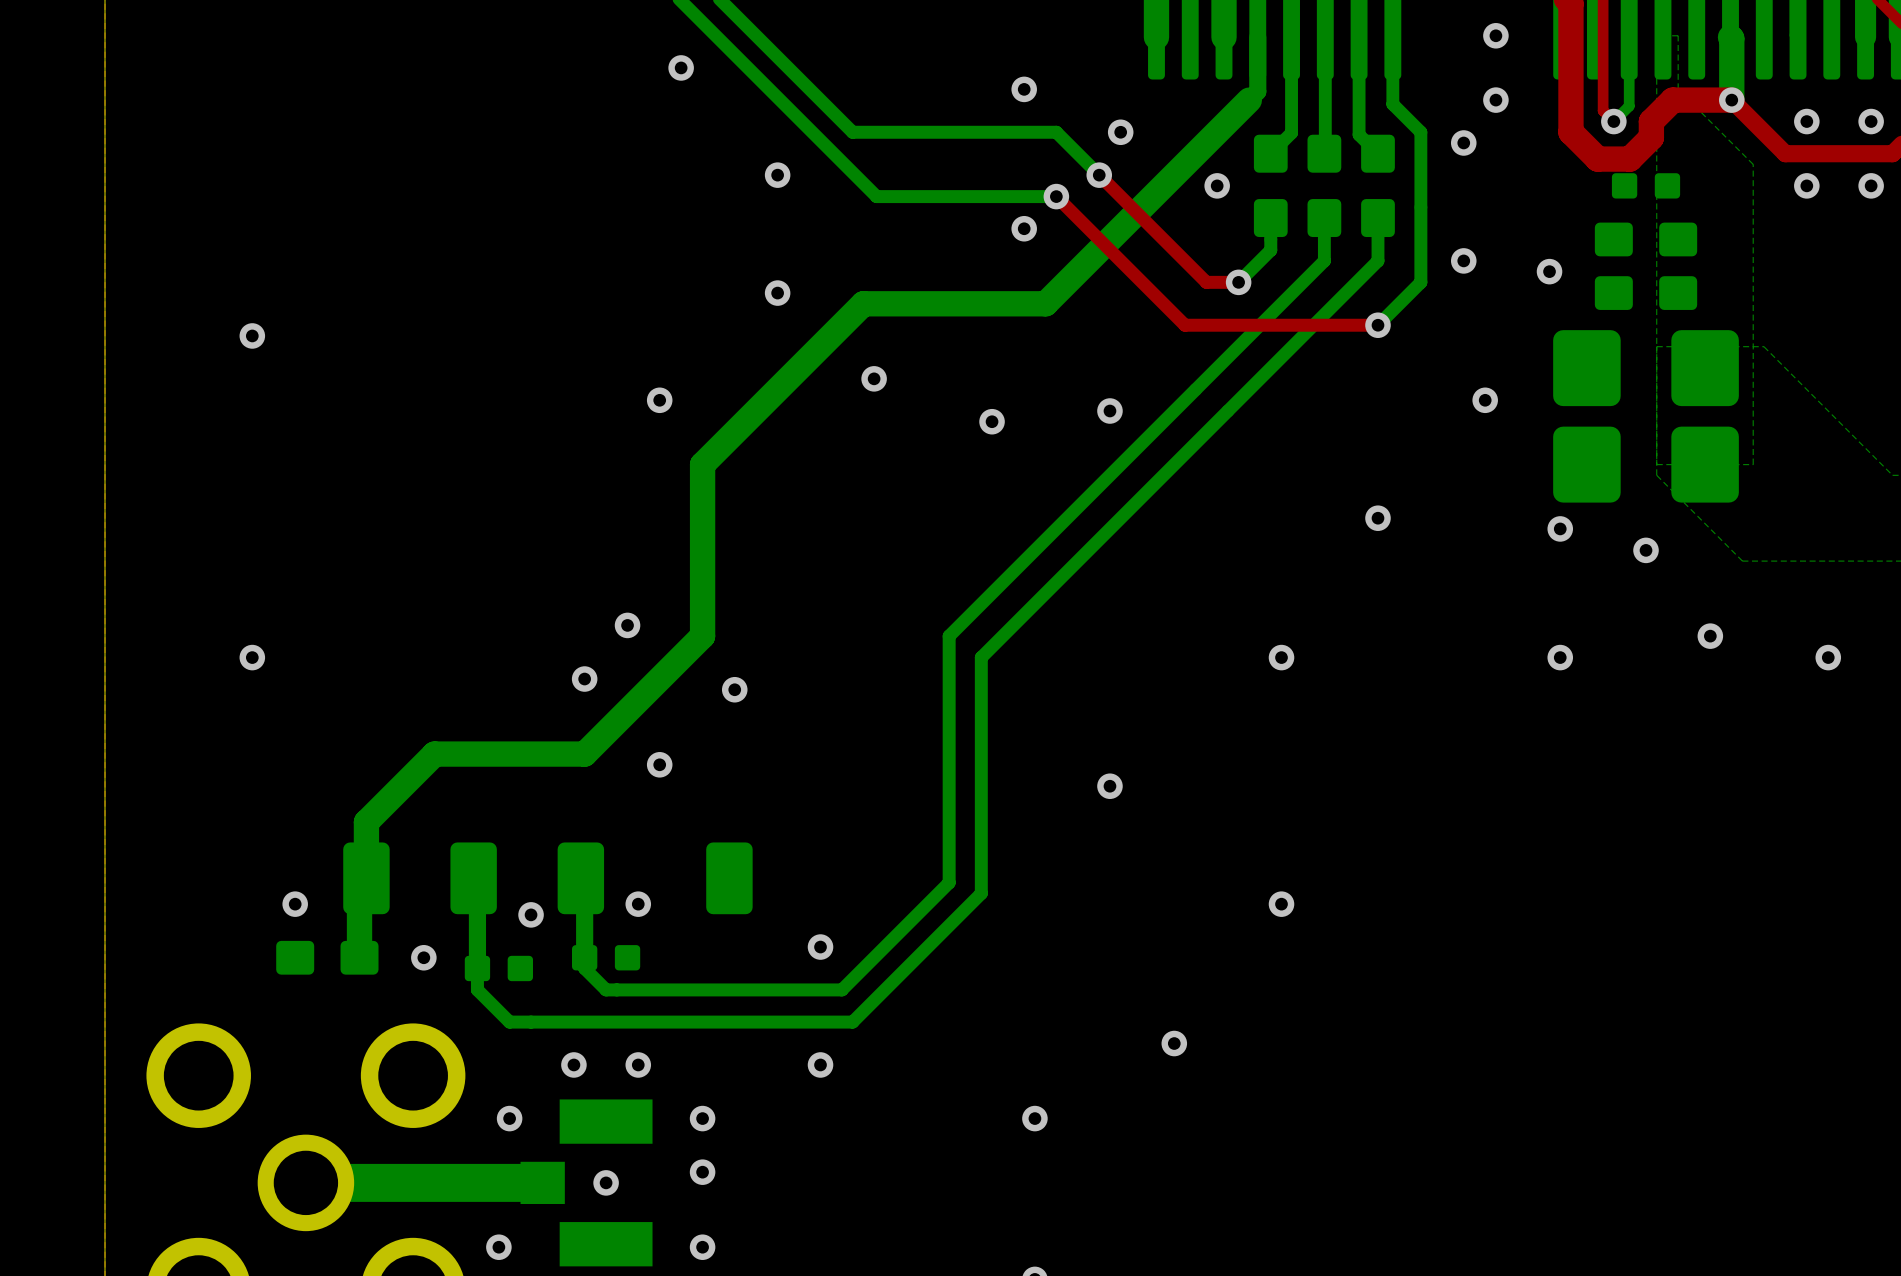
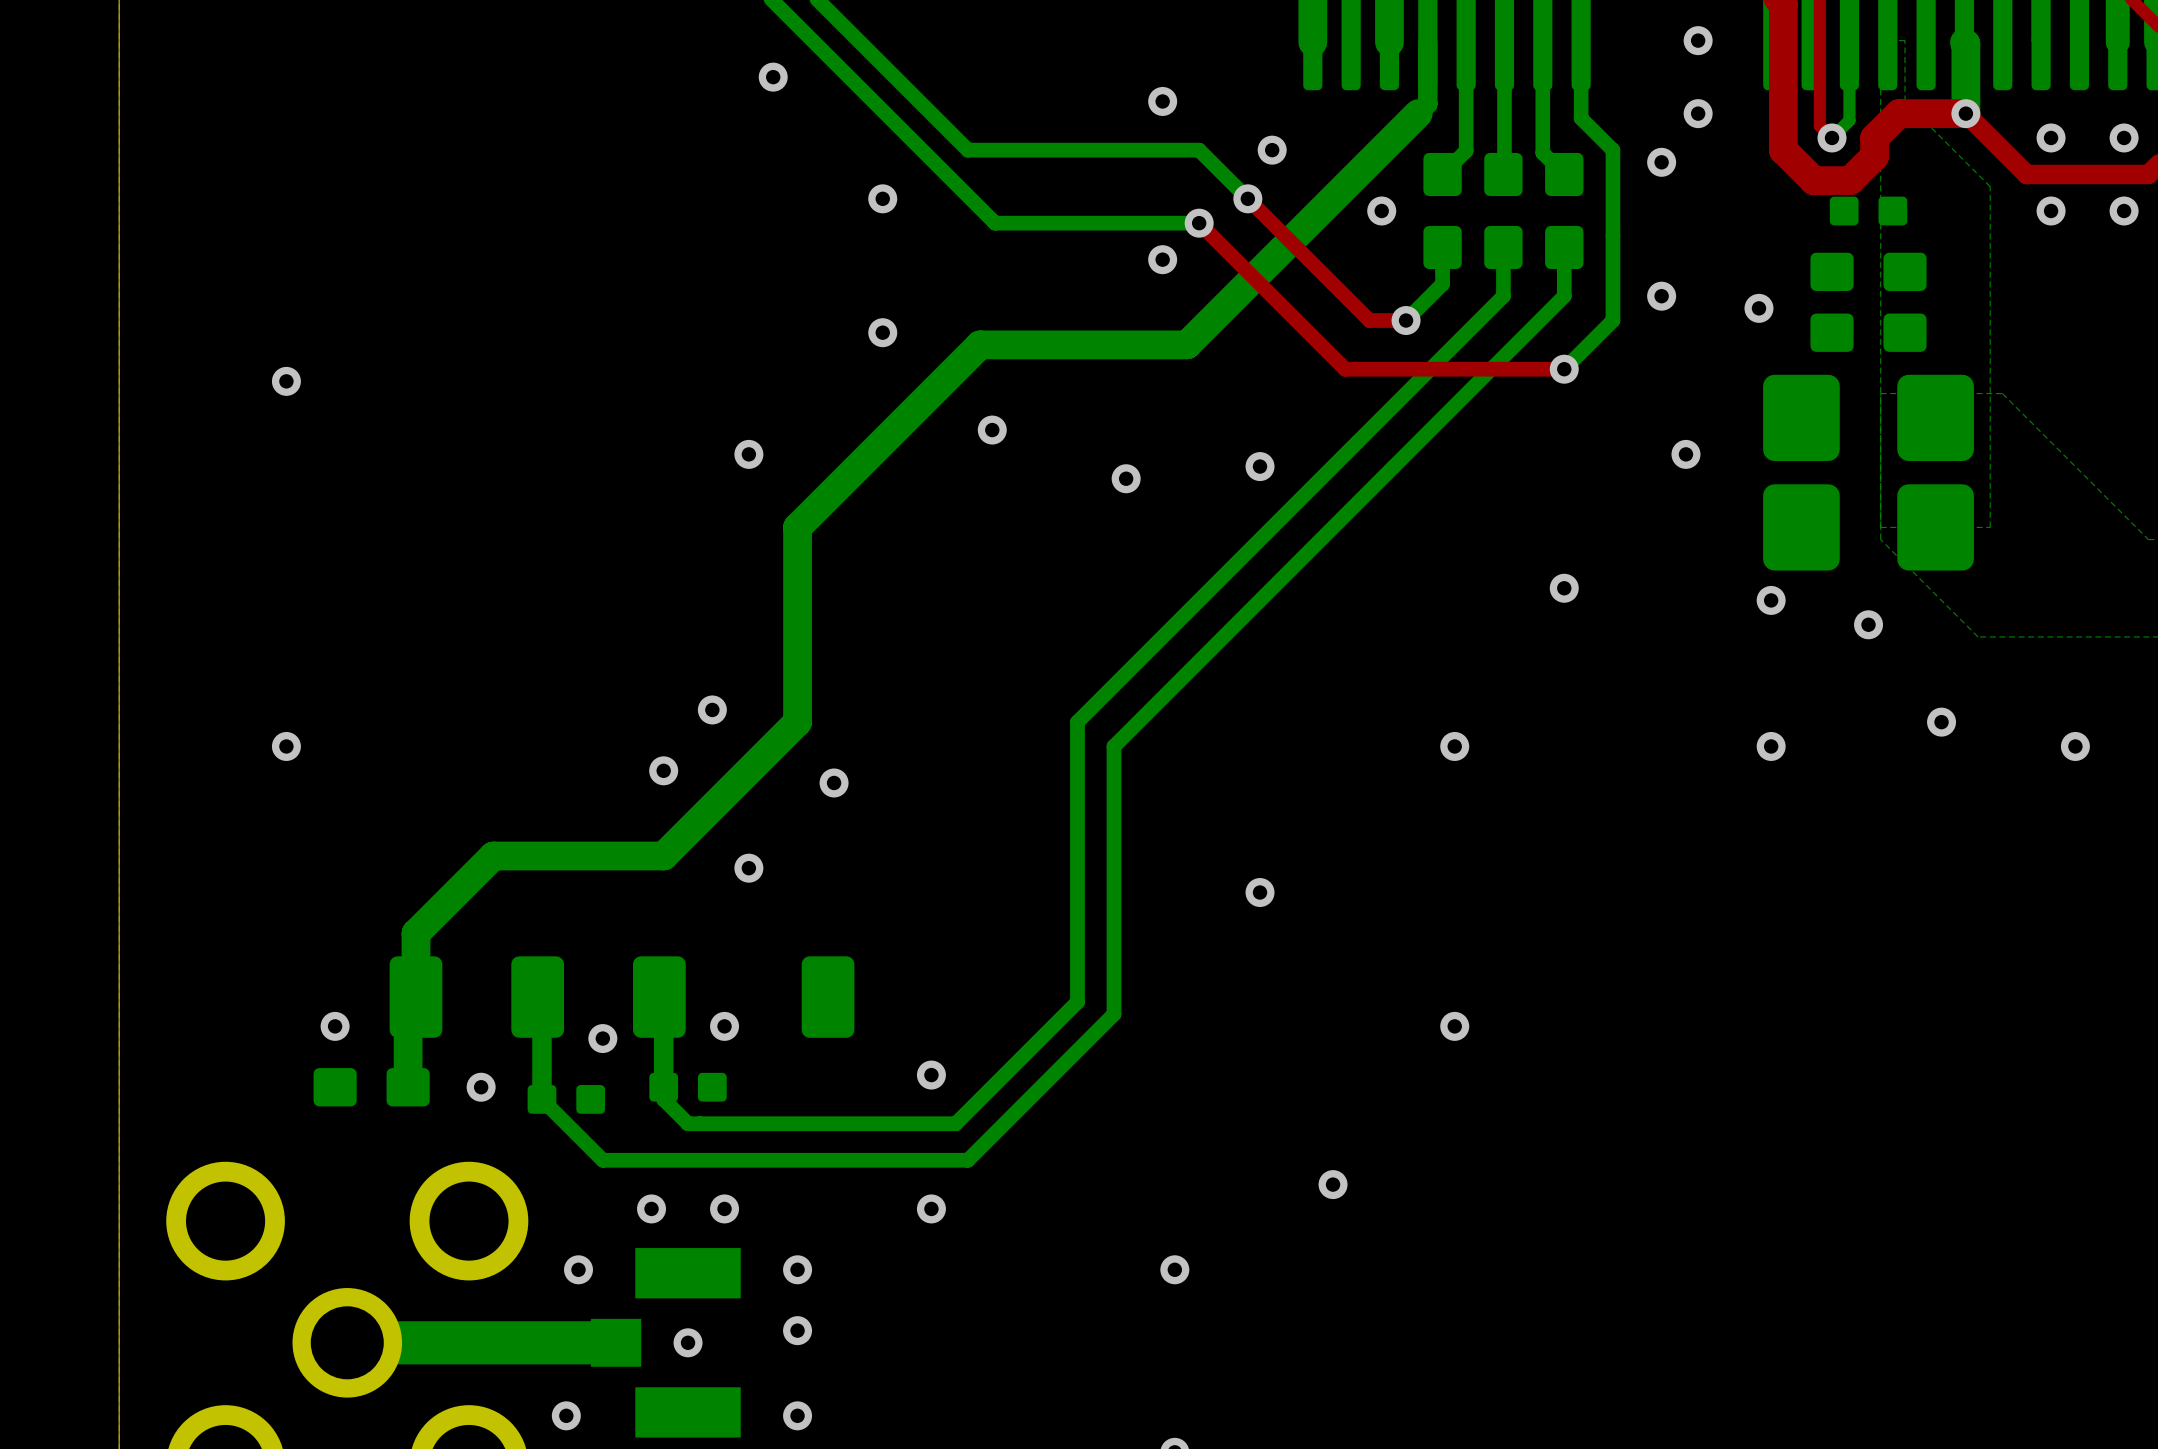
bottom track: (477, 968) (477, 989) (509, 1022) (531, 1022) -> (541, 1099) (602, 1160)

